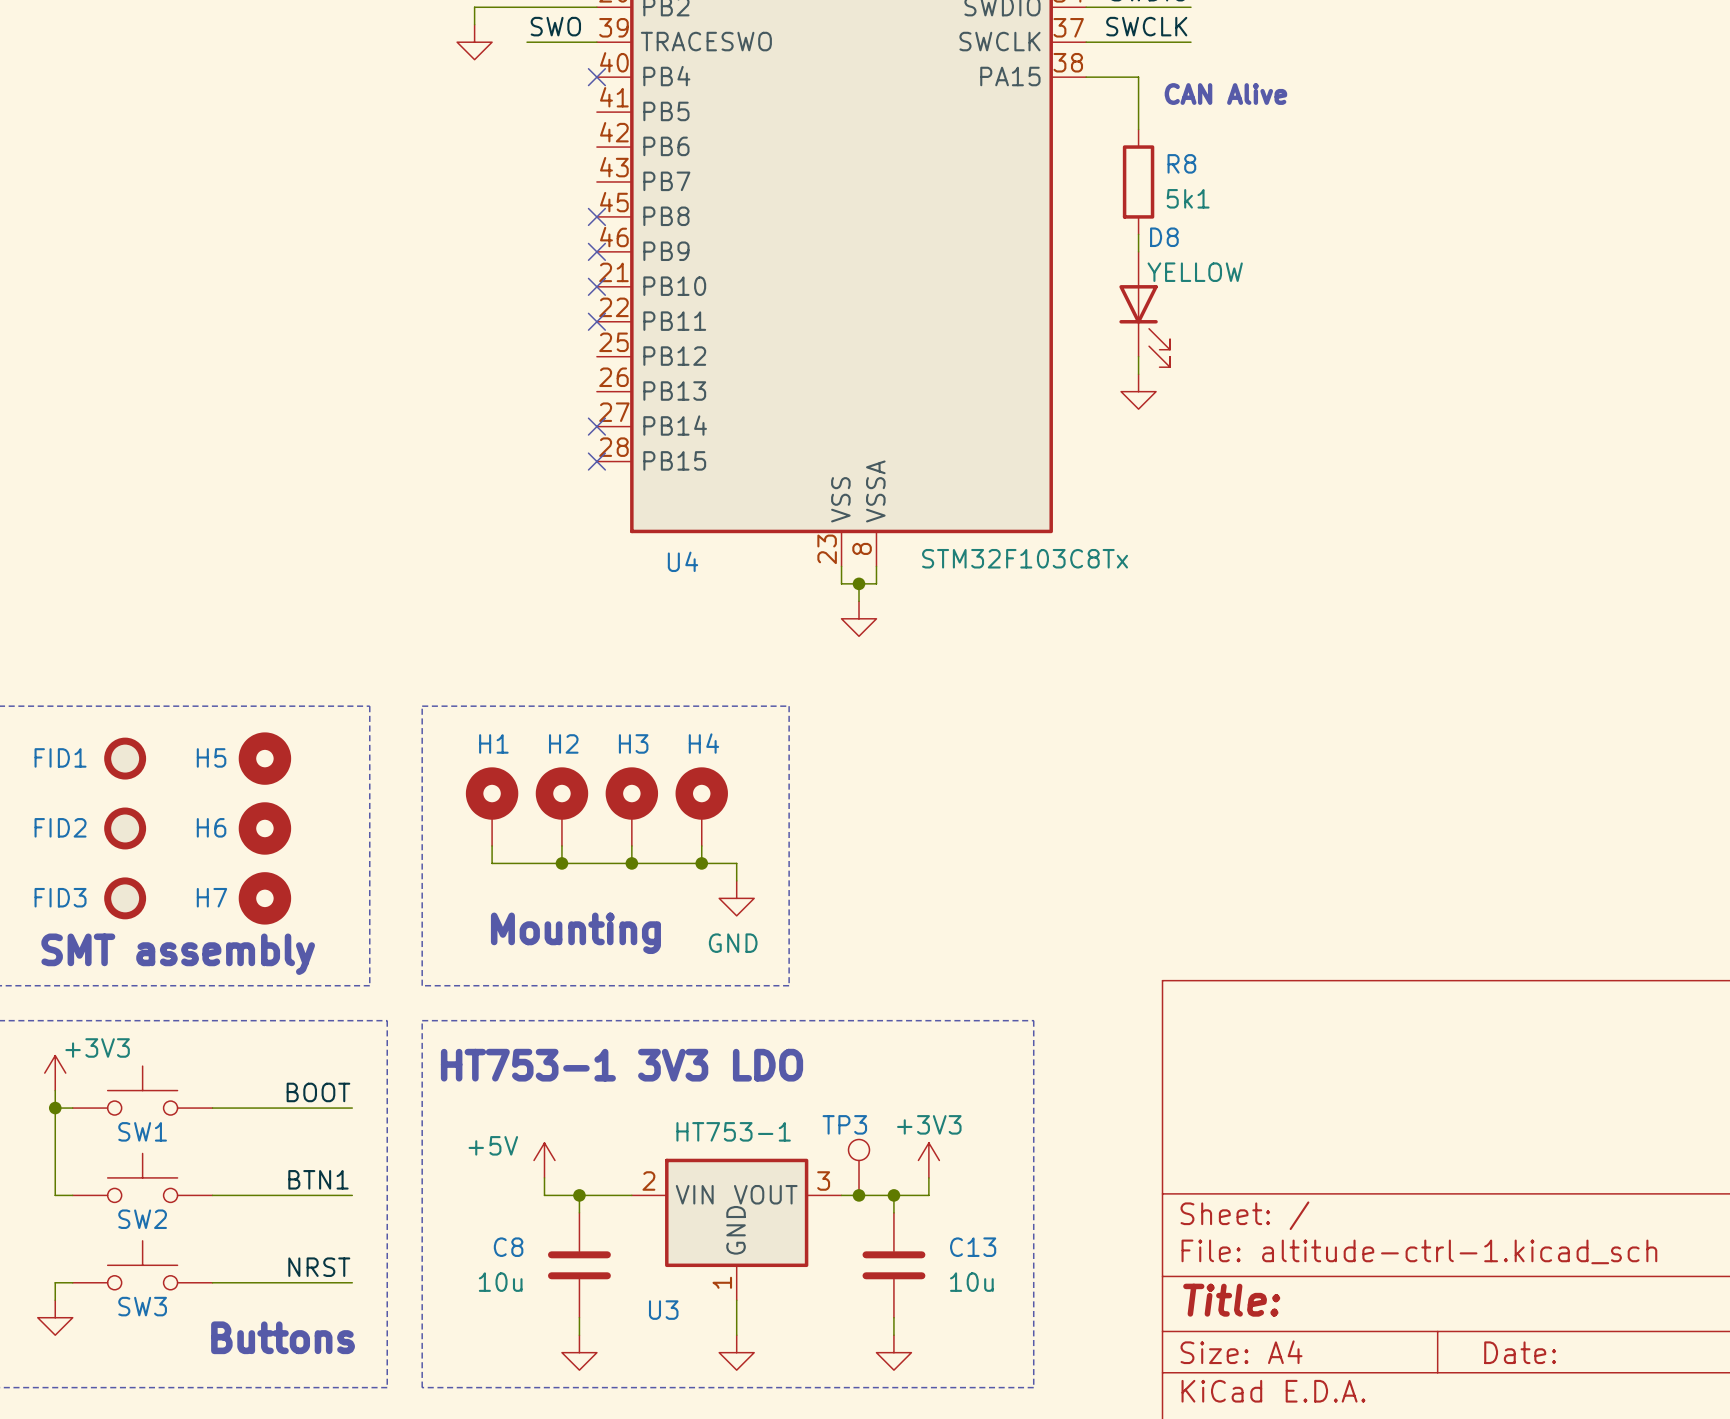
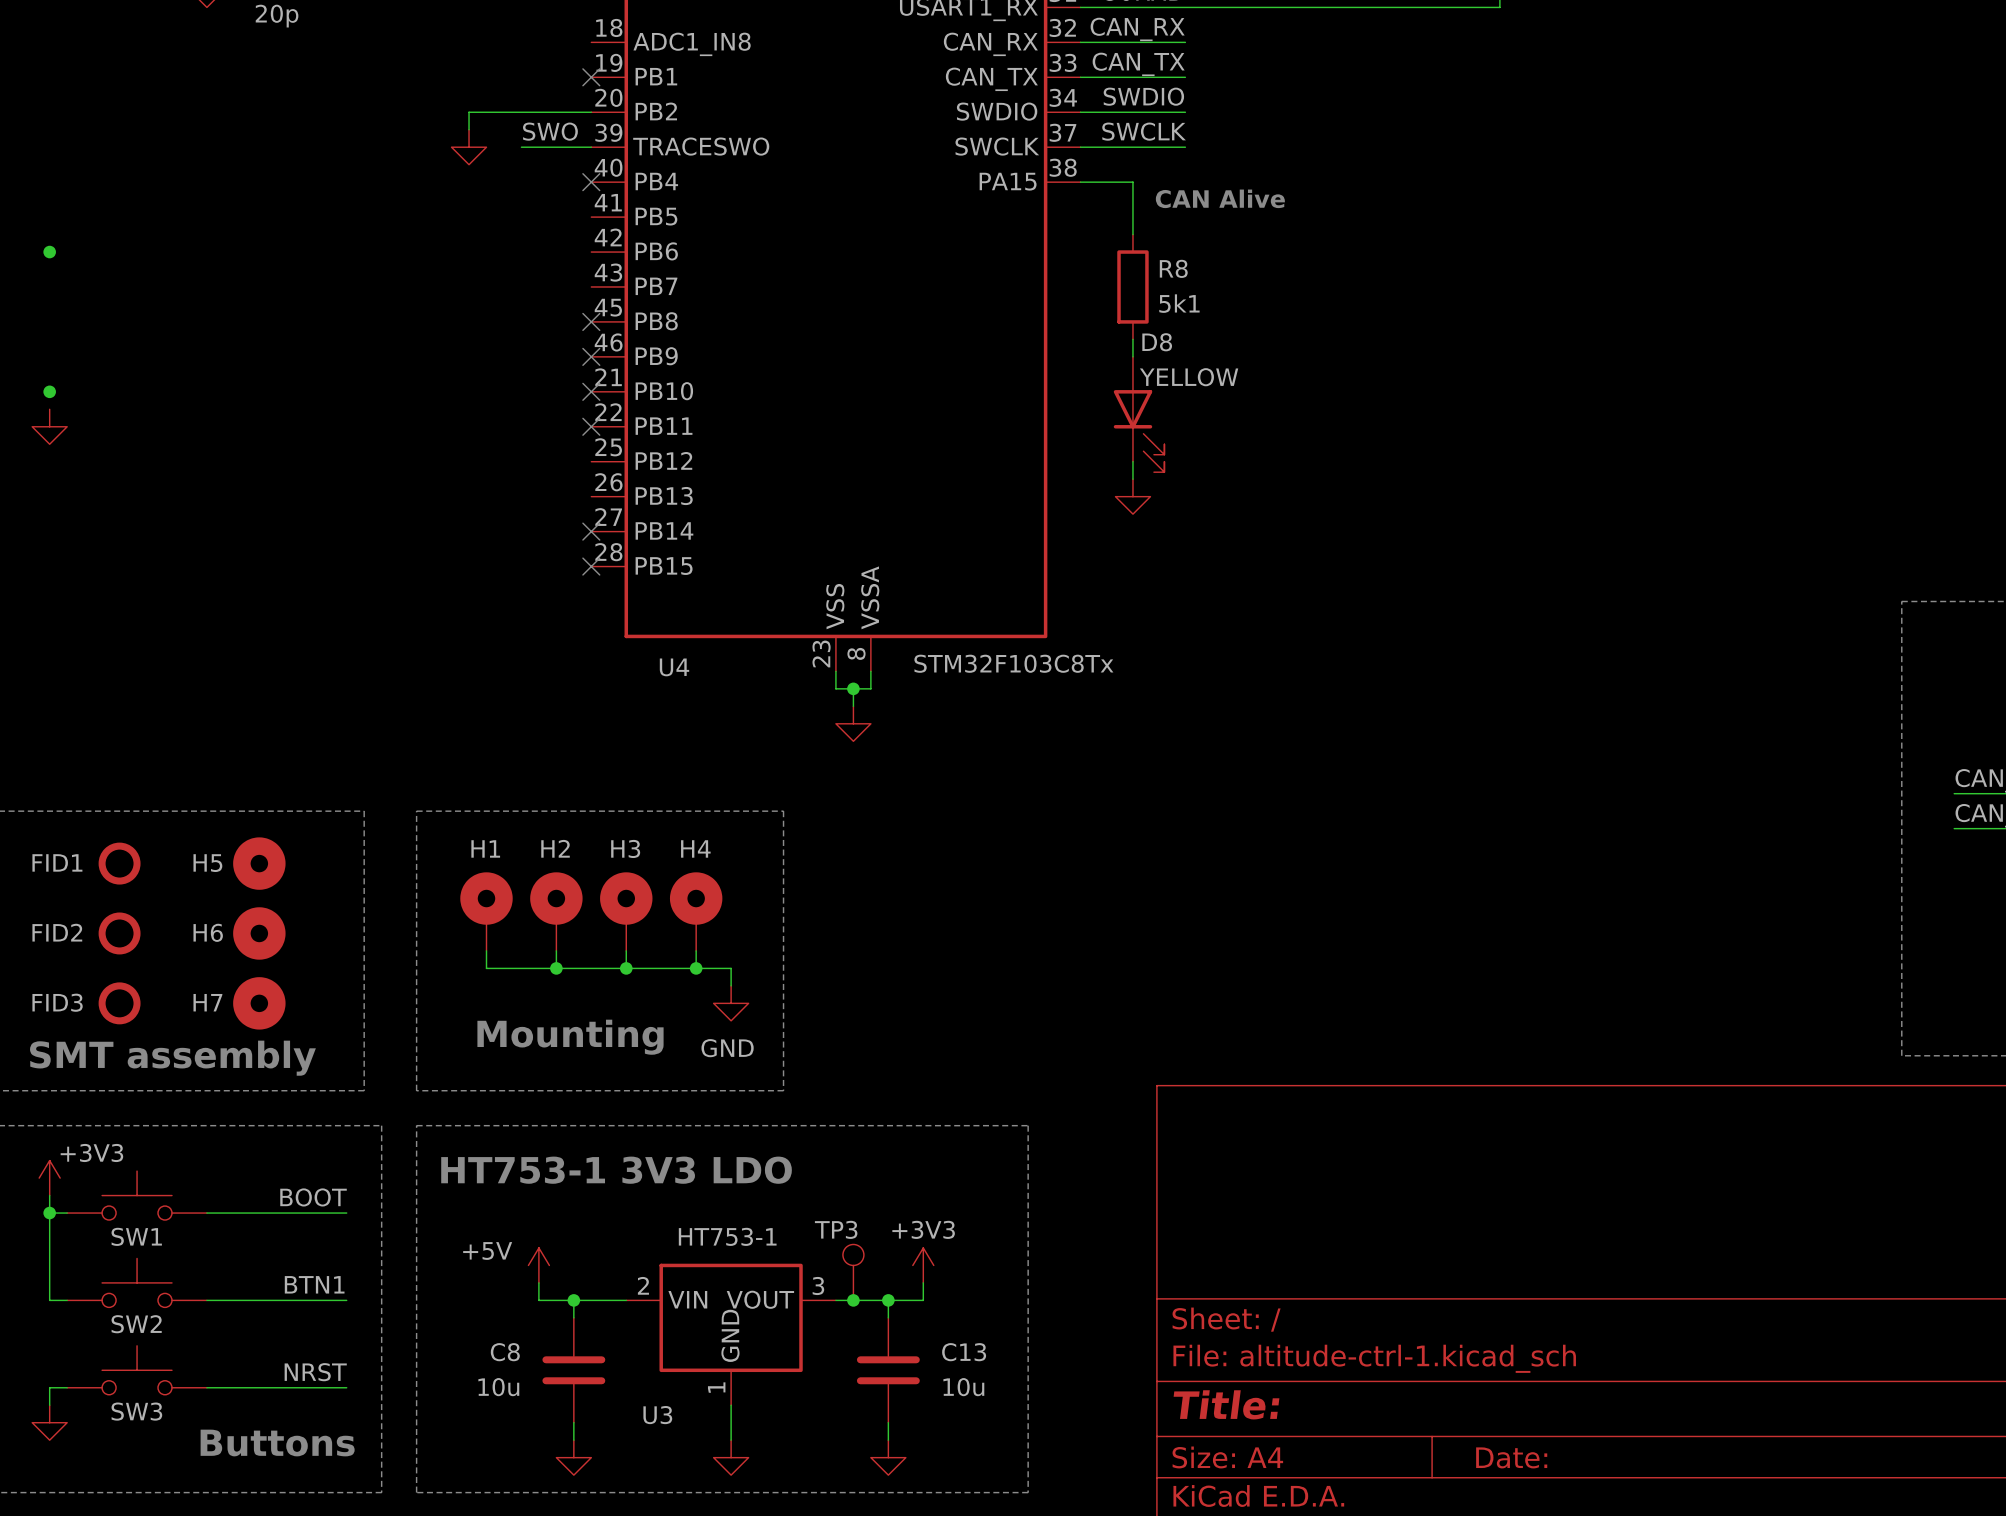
junction: none -> (49, 252)
junction: none -> (49, 391)
power symbol: none -> (49, 426)

